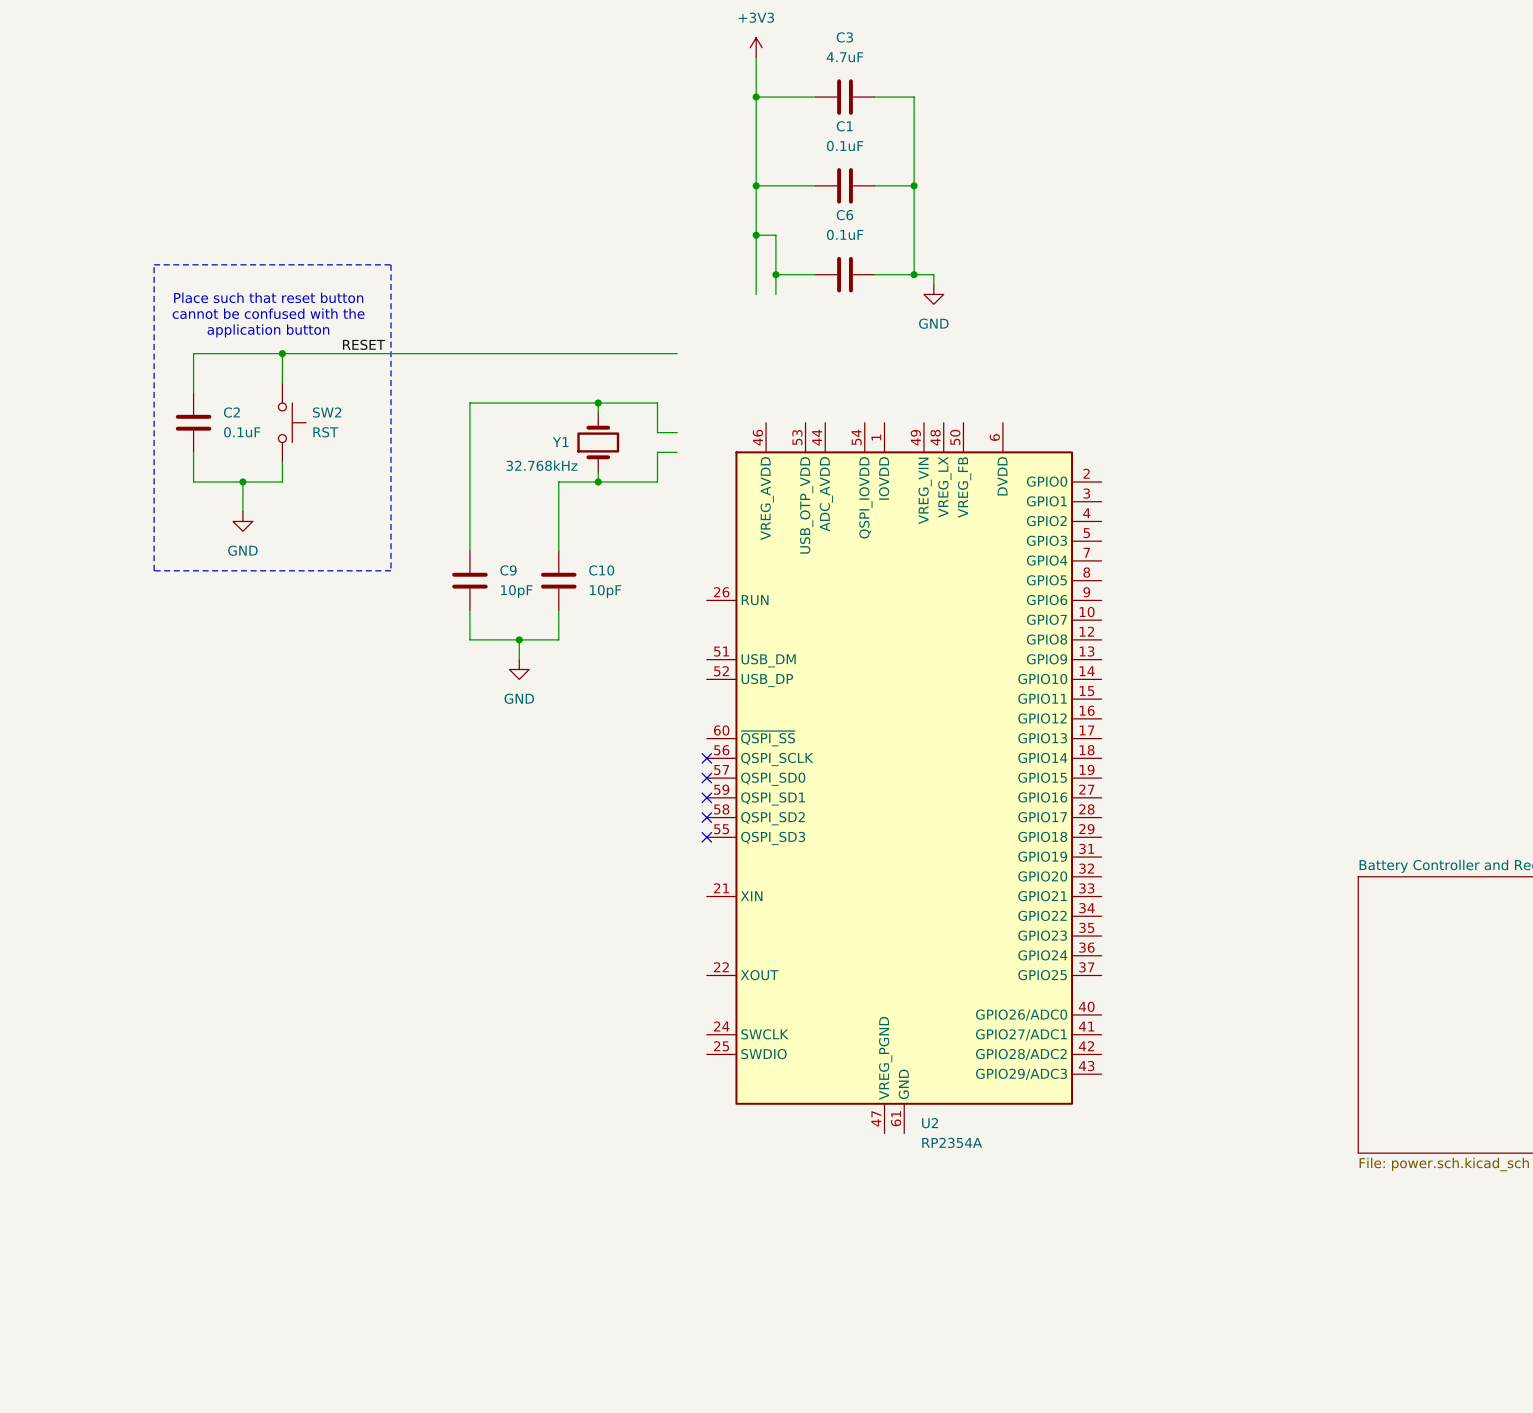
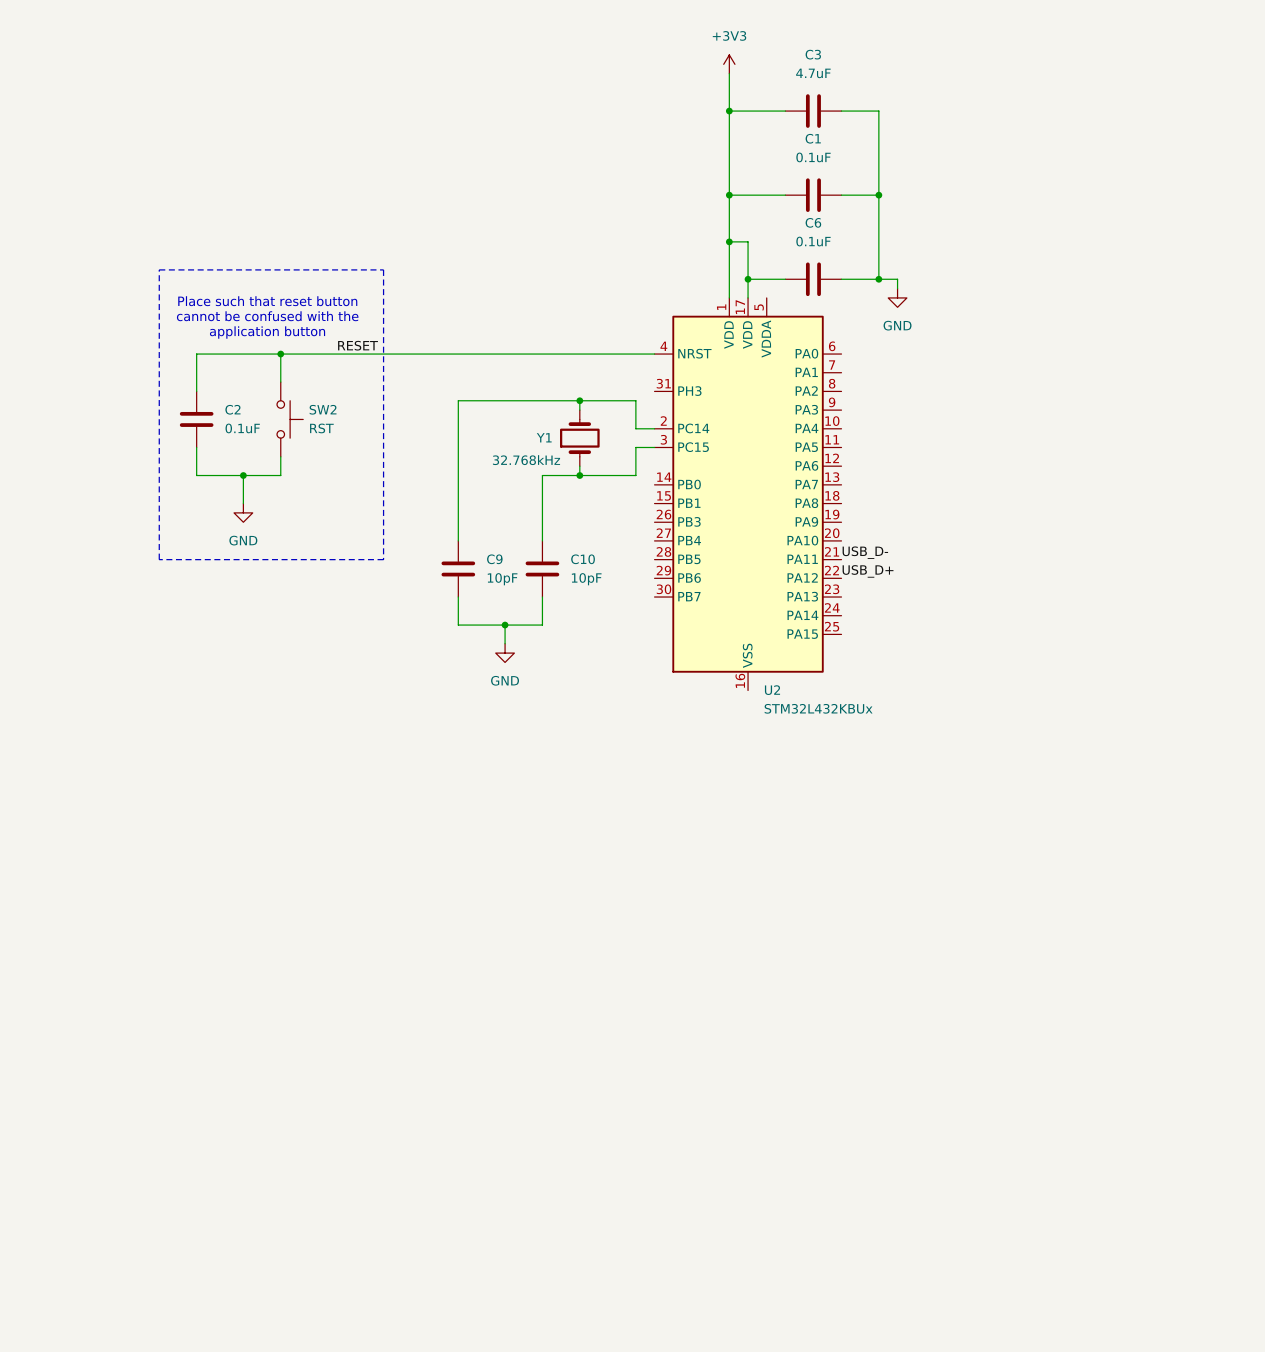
U2 symbol: [706, 422, 1102, 1134] -> [654, 297, 842, 691]
label: none -> USB_D- (865, 552)
label: none -> USB_D+ (868, 571)
no-connect mark: (706, 758) -> none
no-connect mark: (706, 778) -> none
no-connect mark: (706, 797) -> none
no-connect mark: (706, 817) -> none
no-connect mark: (706, 837) -> none
U2 name position: U2 (930, 1123) -> U2 (772, 690)
U2 value: RP2354A (952, 1142) -> STM32L432KBUx (818, 708)

